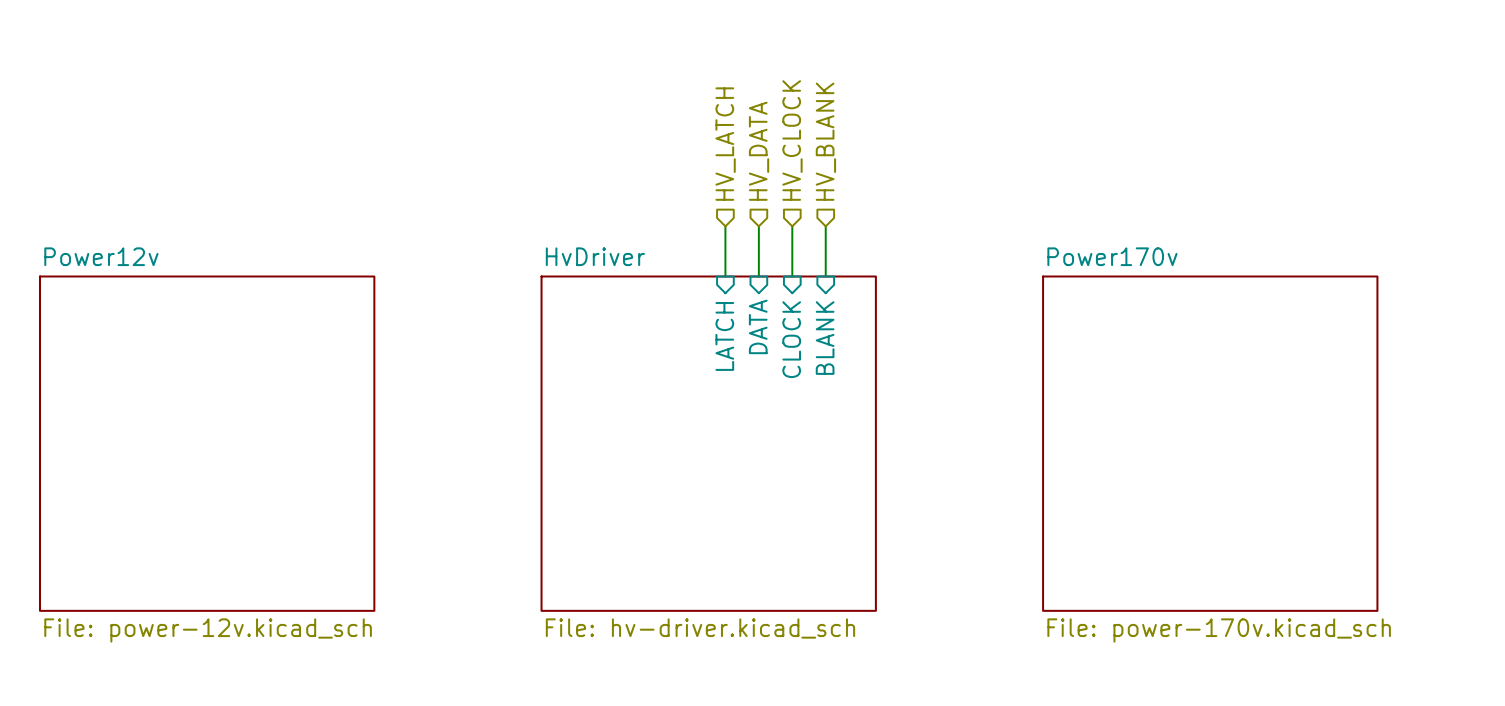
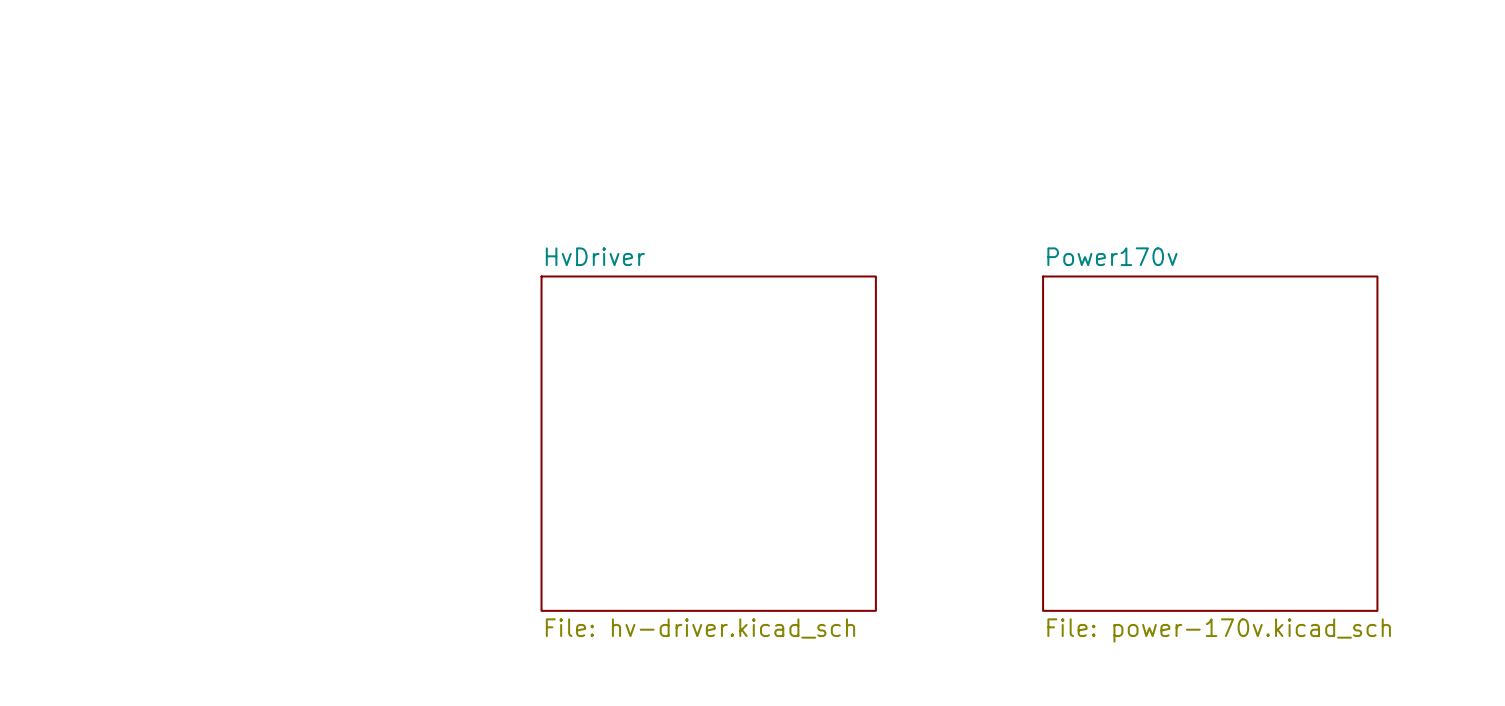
hierarchical label: HV_CLOCK (792, 140) -> none
hierarchical label: HV_BLANK (825, 141) -> none
hierarchical label: HV_LATCH (725, 144) -> none
hierarchical label: HV_DATA (759, 151) -> none
wire: (725, 226) (725, 276) -> none
wire: (758, 226) (758, 276) -> none
wire: (792, 226) (792, 276) -> none
wire: (825, 226) (825, 276) -> none
sheet pin: DATA (758, 326) -> none
sheet pin: LATCH (724, 336) -> none
sheet pin: BLANK (825, 338) -> none
sheet pin: CLOCK (791, 339) -> none
sheet Power12v: File: power-12v.kicad_sch (207, 443) -> none

